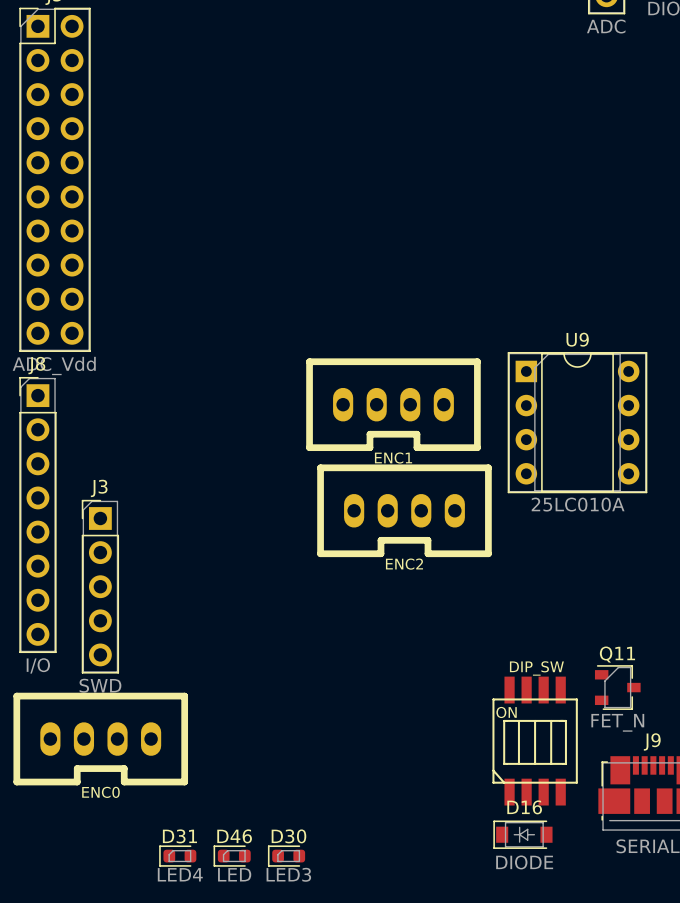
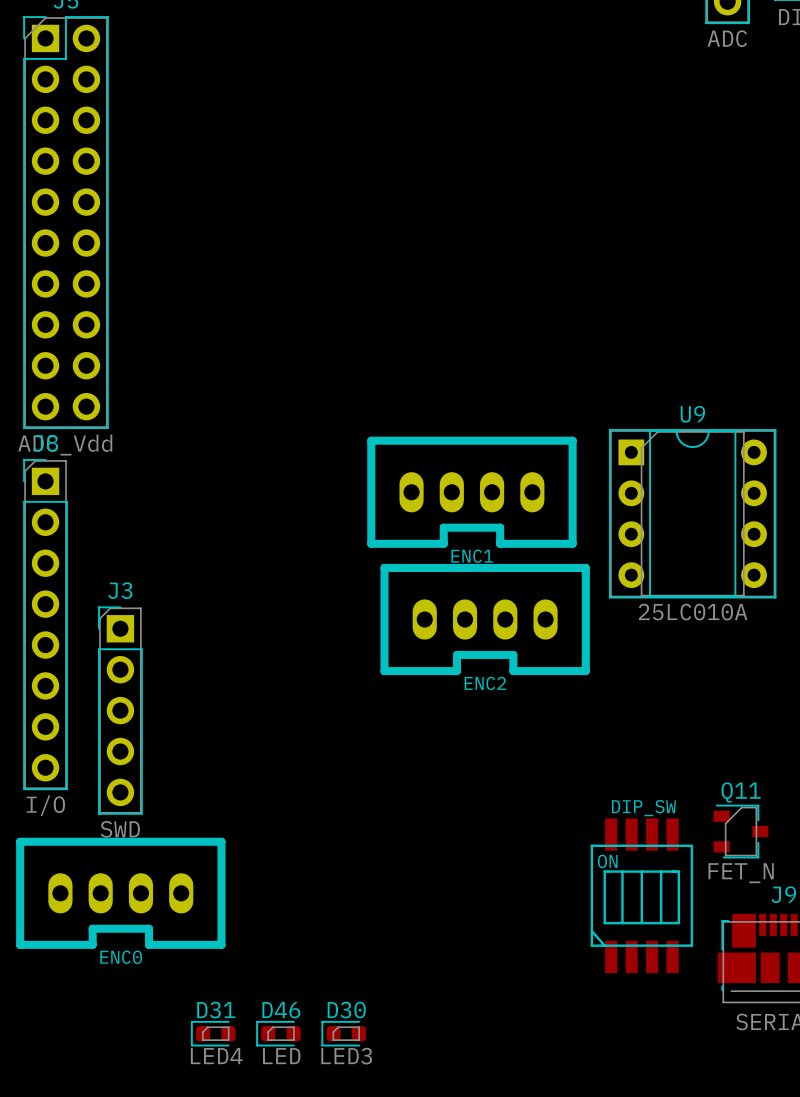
D16: DIODE (522, 834) -> none

